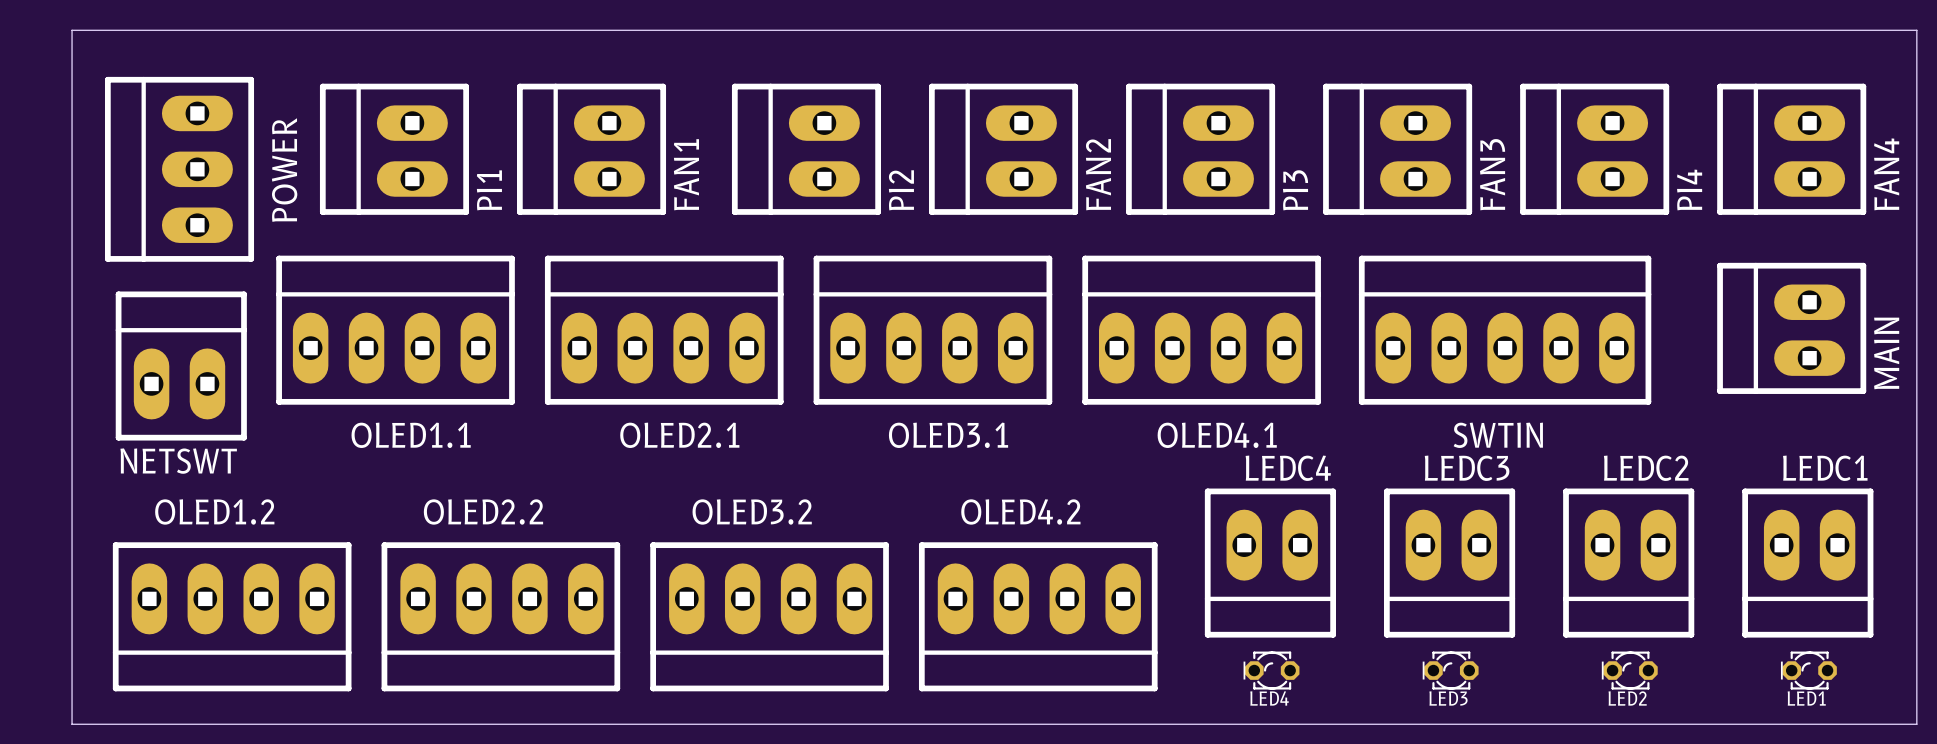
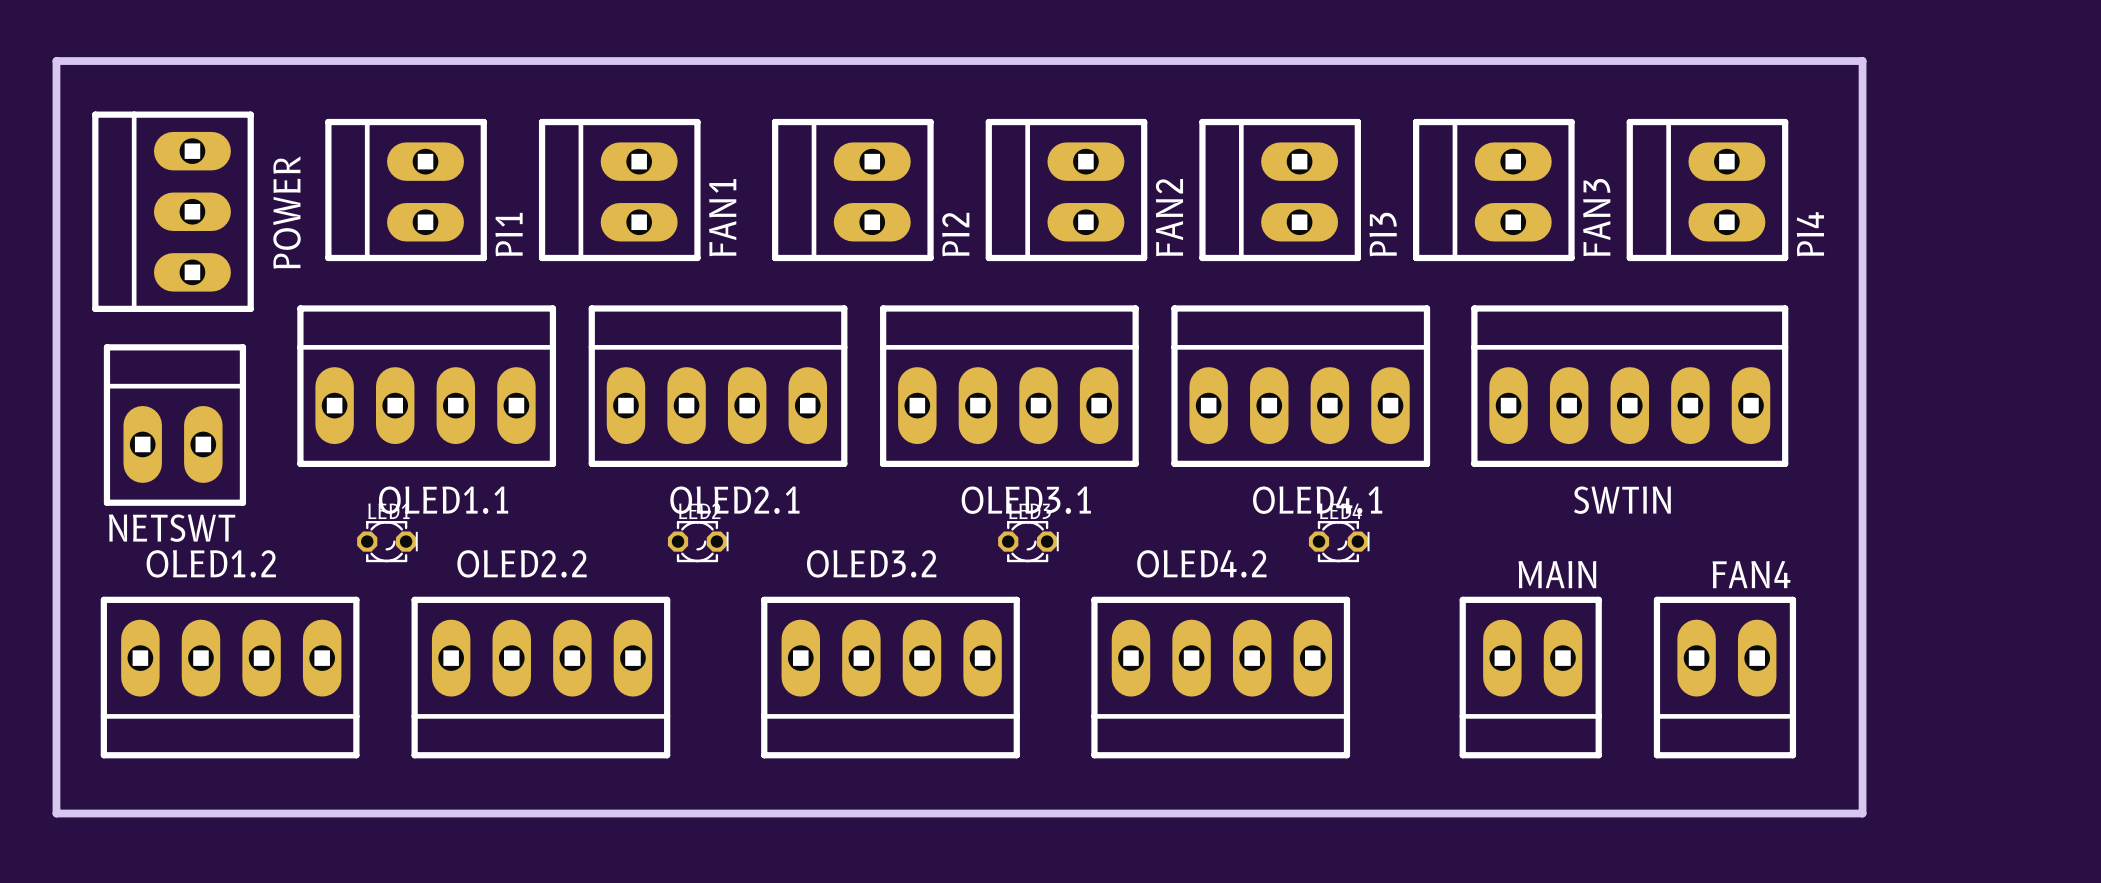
board edge: (1737, 30) (1916, 30) (1916, 724) (1737, 724) -> (1862, 61) (1862, 813)
board edge width: thin (1737, 30) (72, 30) (72, 724) (1737, 724) -> thick (1862, 61) (56, 61) (56, 813) (1862, 813)
FAN4 rotation: 0° (1791, 149) -> 90° counterclockwise (1724, 677)
FAN4 position: (1791, 149) -> (1724, 677)
MAIN: (1791, 328) -> none
OLED1.1 position: (395, 330) -> (426, 386)
OLED2.1 position: (664, 330) -> (718, 386)
OLED3.1 position: (932, 330) -> (1009, 386)
OLED4.1 position: (1201, 330) -> (1300, 386)
SWTIN position: (1505, 330) -> (1629, 386)
LEDC4: (1270, 563) -> none
LEDC3: (1449, 563) -> none
LEDC2: (1628, 563) -> none
LEDC1: (1807, 563) -> none
MAIN: none -> (1530, 677)
OLED1.2 position: (232, 616) -> (230, 677)
OLED2.2 position: (500, 616) -> (540, 677)
OLED3.2 position: (769, 616) -> (890, 677)
OLED4.2 position: (1038, 616) -> (1220, 677)
LED4 rotation: 0° (1271, 670) -> 180° (1339, 541)
LED4 position: (1271, 670) -> (1339, 541)
LED3 rotation: 0° (1450, 670) -> 180° (1028, 541)
LED3 position: (1450, 670) -> (1028, 541)
LED2 rotation: 0° (1629, 670) -> 180° (698, 541)
LED2 position: (1629, 670) -> (698, 541)
LED1 rotation: 0° (1808, 670) -> 180° (387, 541)
LED1 position: (1808, 670) -> (387, 541)

